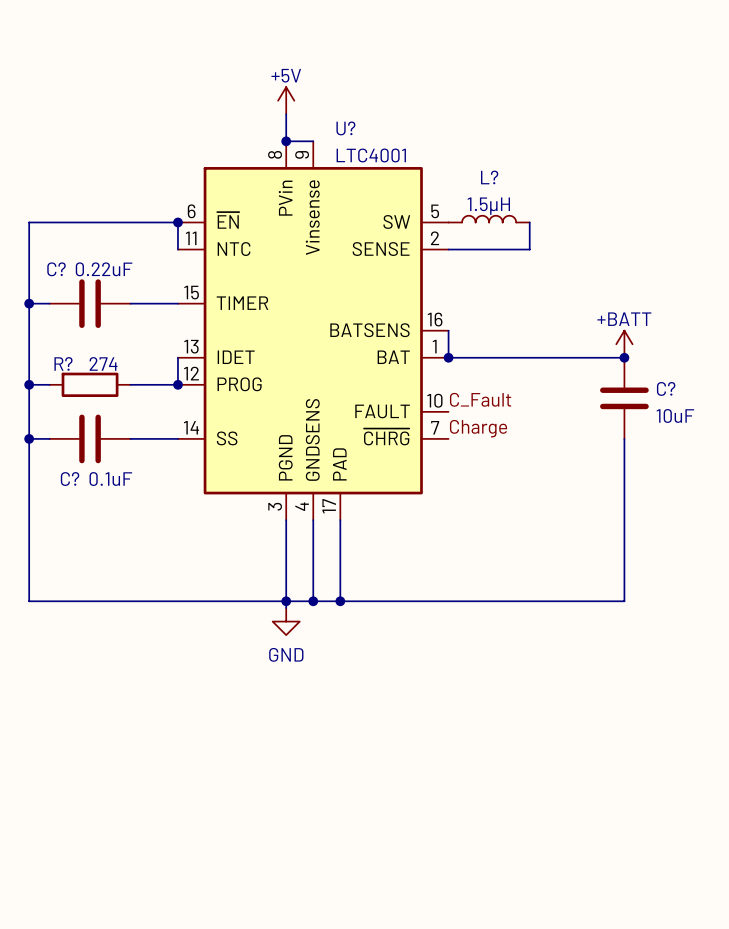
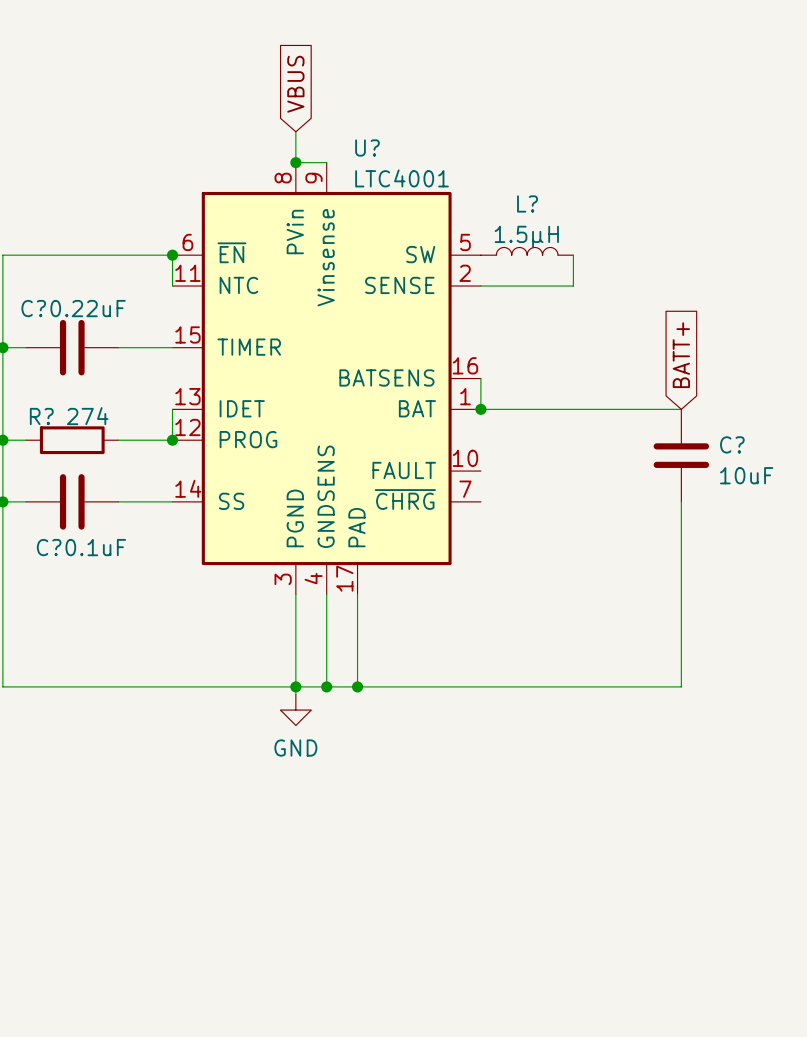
global label: none -> VBUS (295, 84)
power symbol: +5V (286, 100) -> none
global label: none -> BATT+ (681, 355)
power symbol: +BATT (624, 344) -> none
junction: (624, 357) -> none
label: C_Fault (480, 399) -> none
label: Charge (478, 428) -> none

